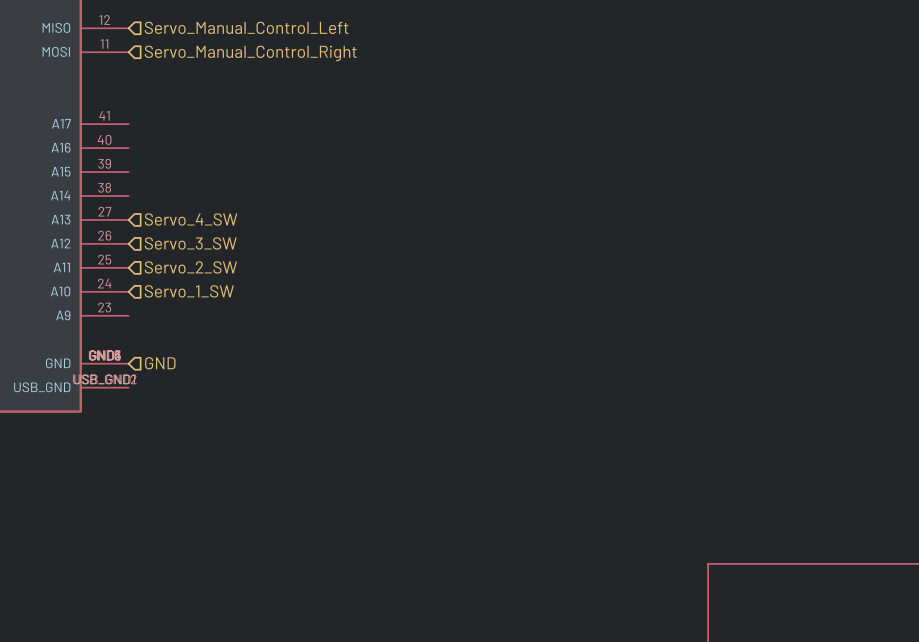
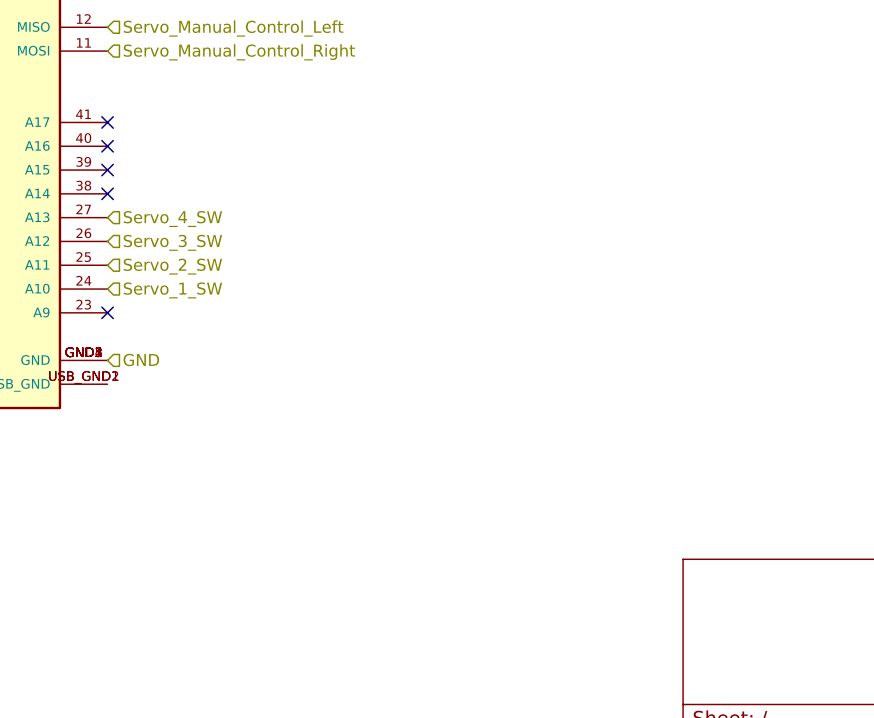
no-connect mark: none -> (107, 122)
no-connect mark: none -> (107, 146)
no-connect mark: none -> (107, 170)
no-connect mark: none -> (107, 193)
no-connect mark: none -> (107, 312)

